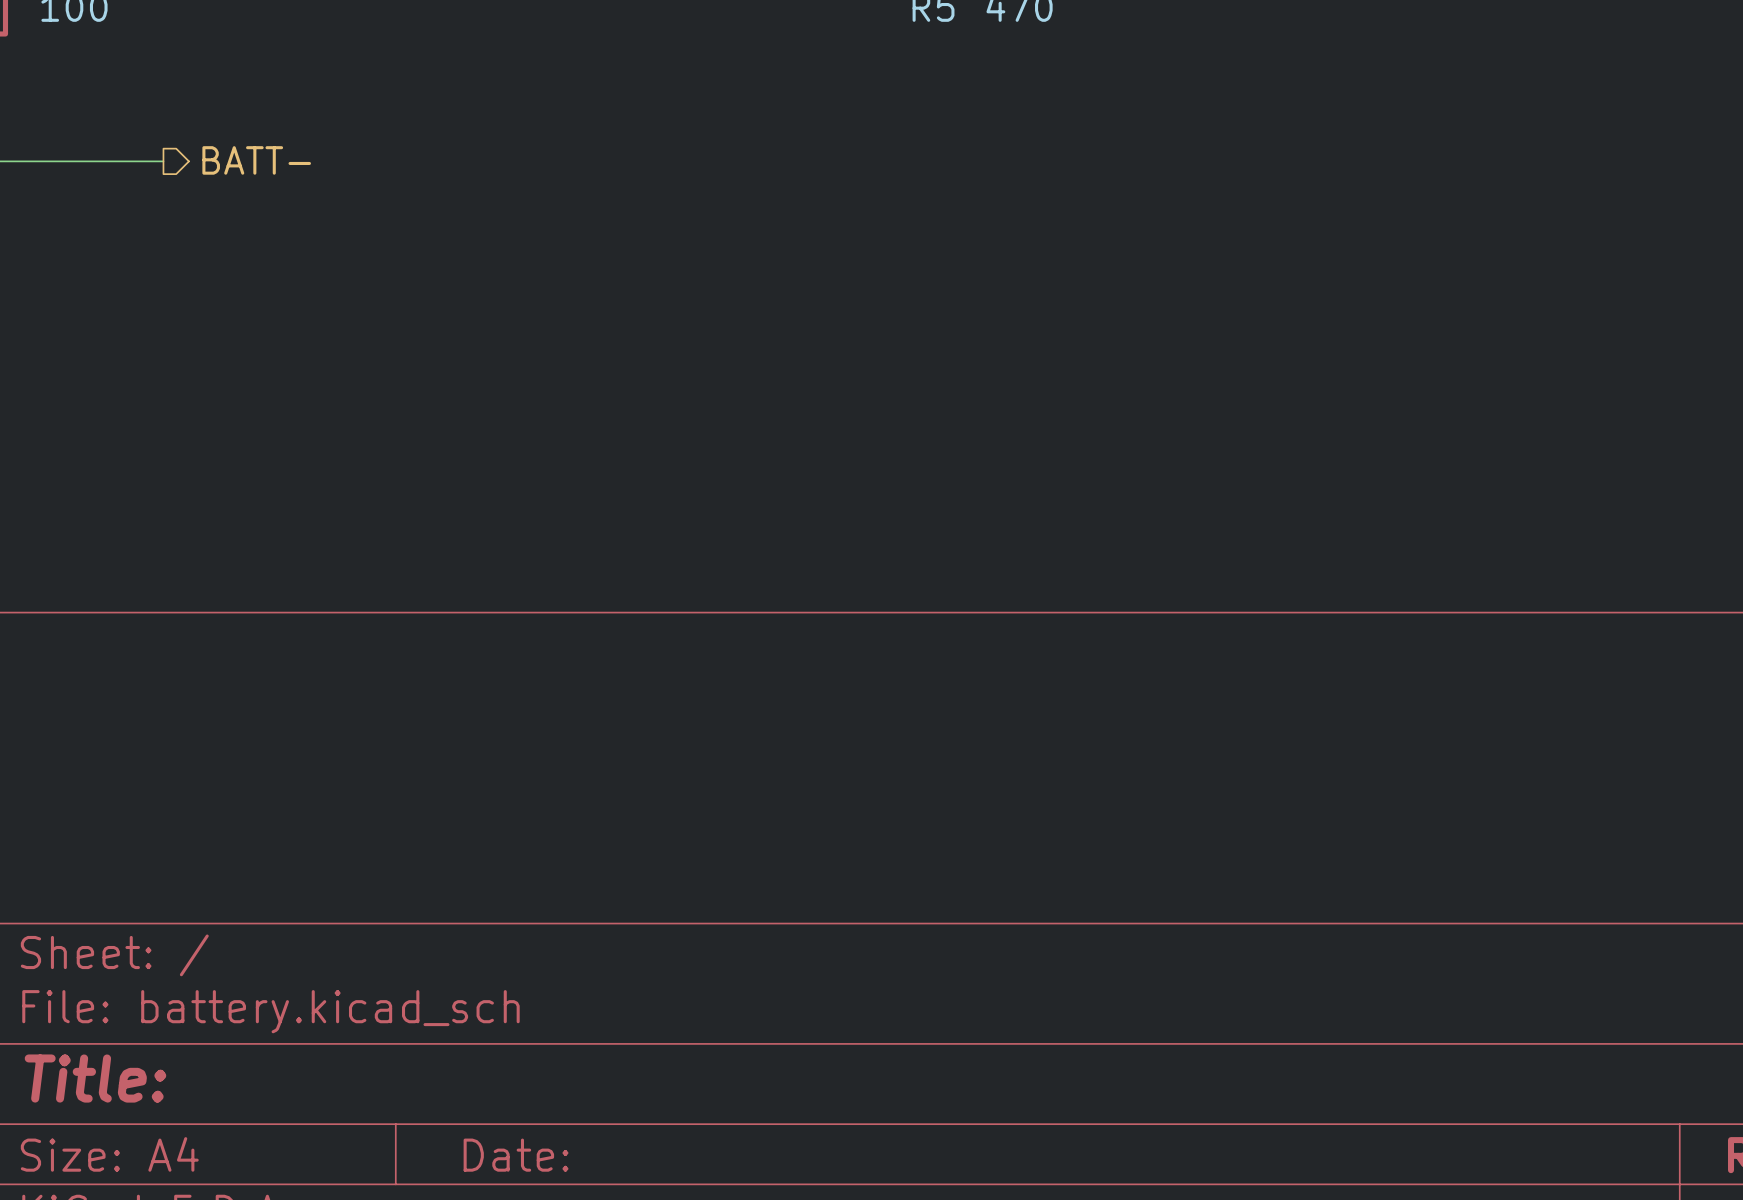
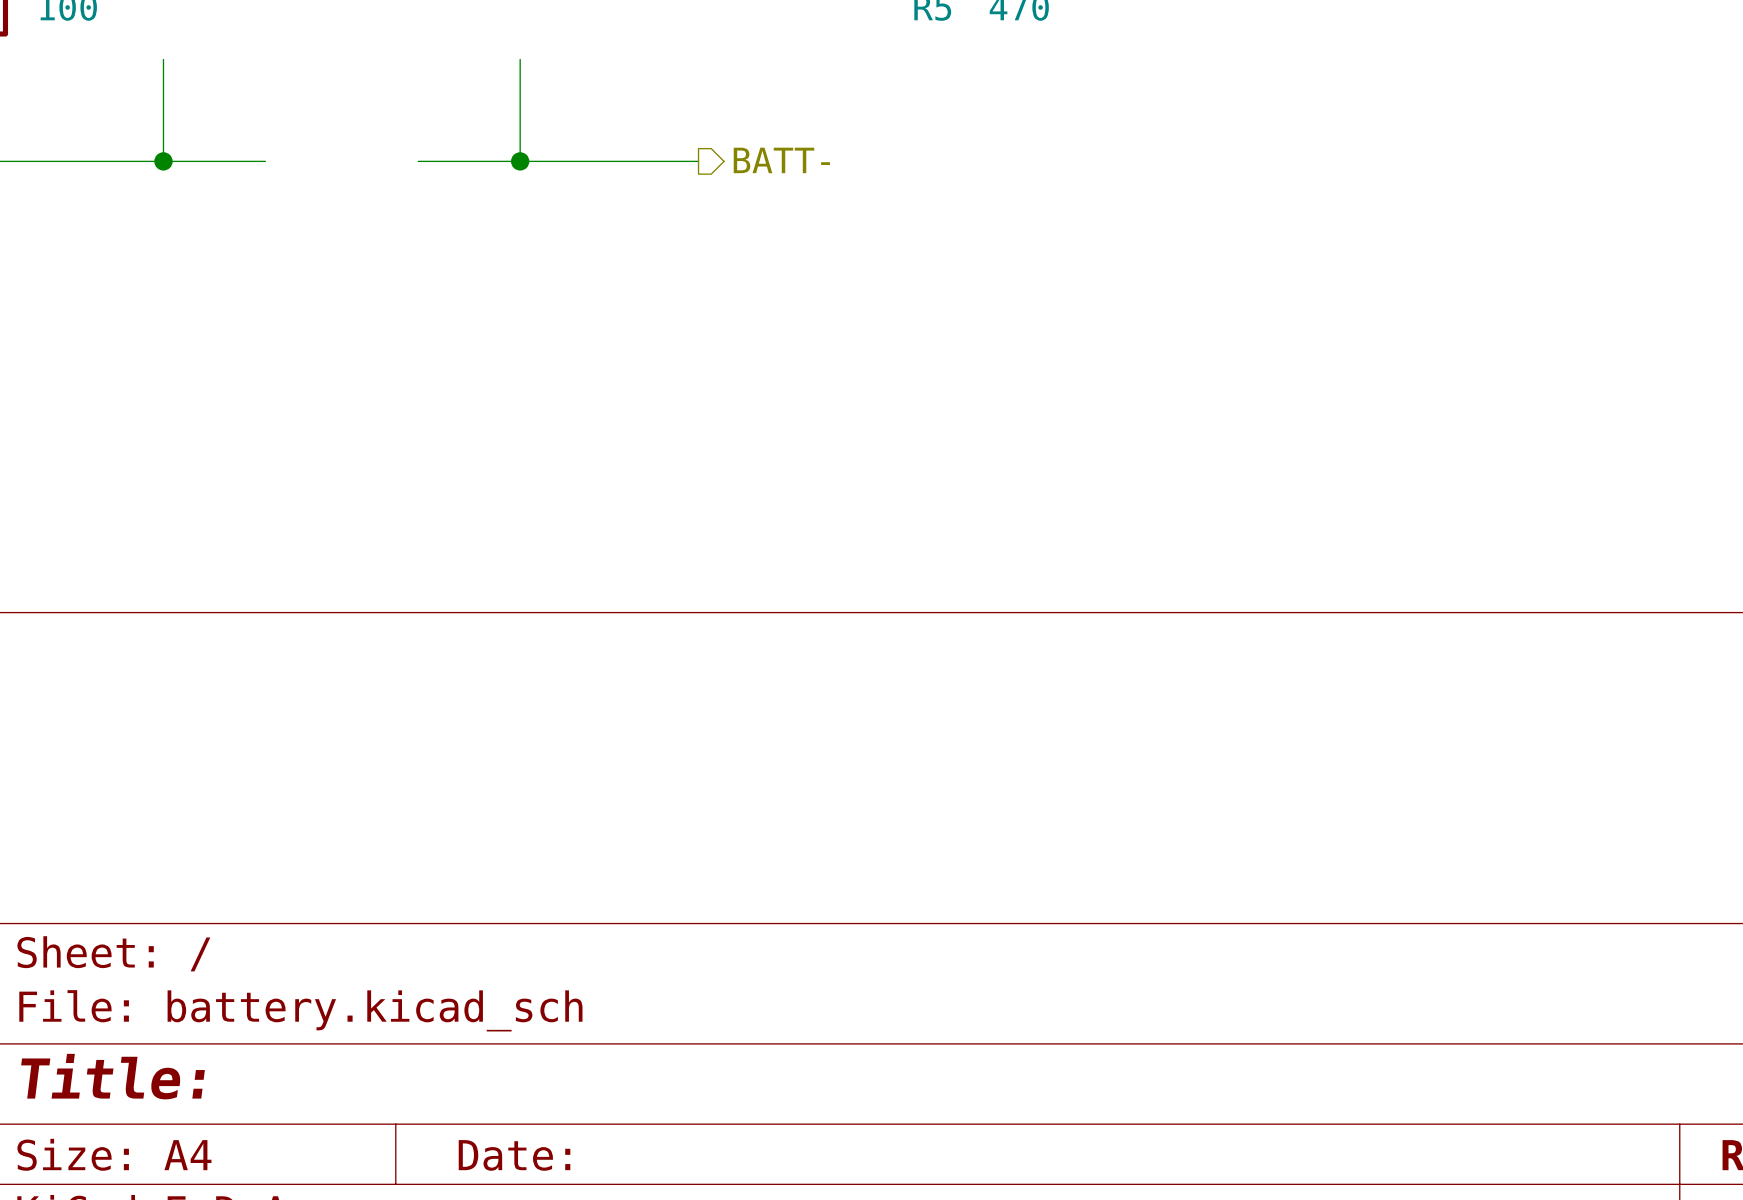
wire: none -> (163, 59) (163, 161) (265, 161)
wire: none -> (520, 59) (520, 161)
hierarchical label: BATT- (256, 160) -> none
hierarchical label: none -> BATT- (781, 160)
junction: none -> (163, 161)
wire: none -> (418, 161) (698, 161)
junction: none -> (520, 161)

